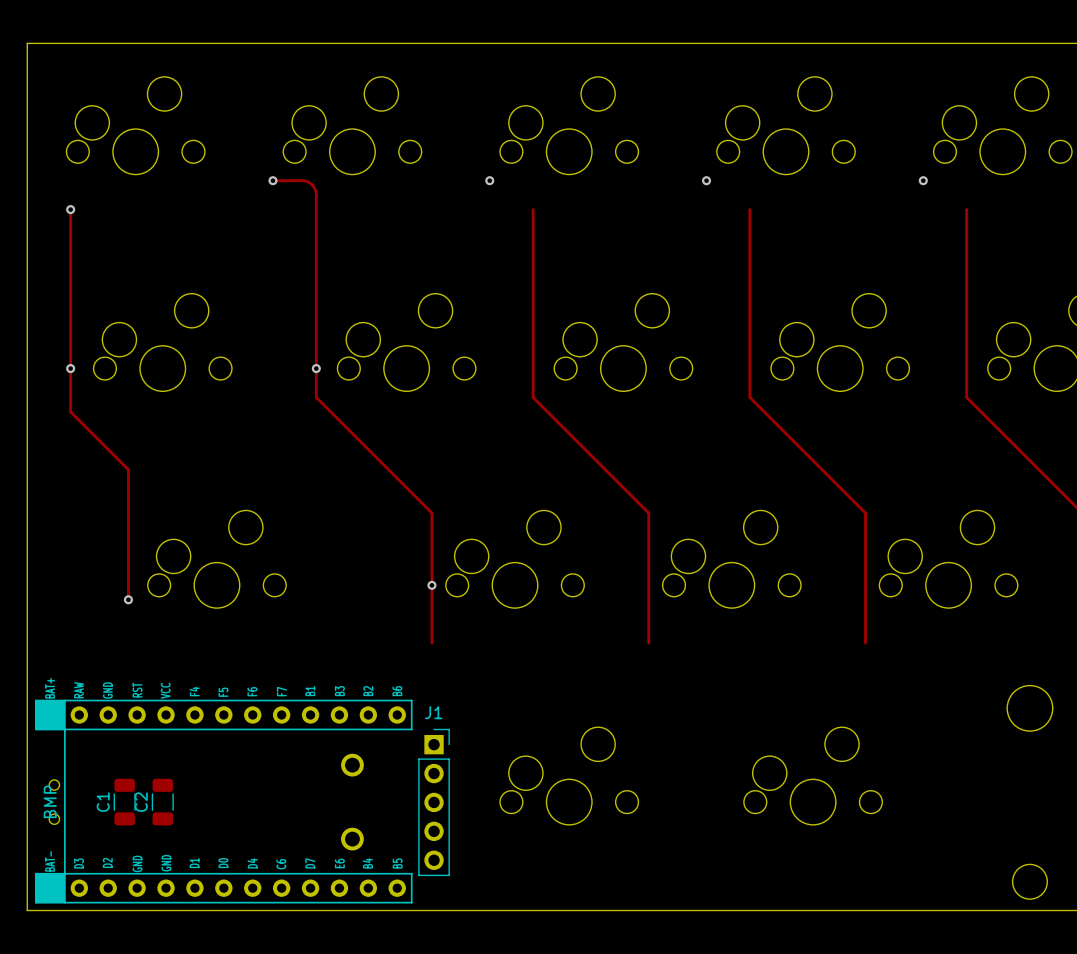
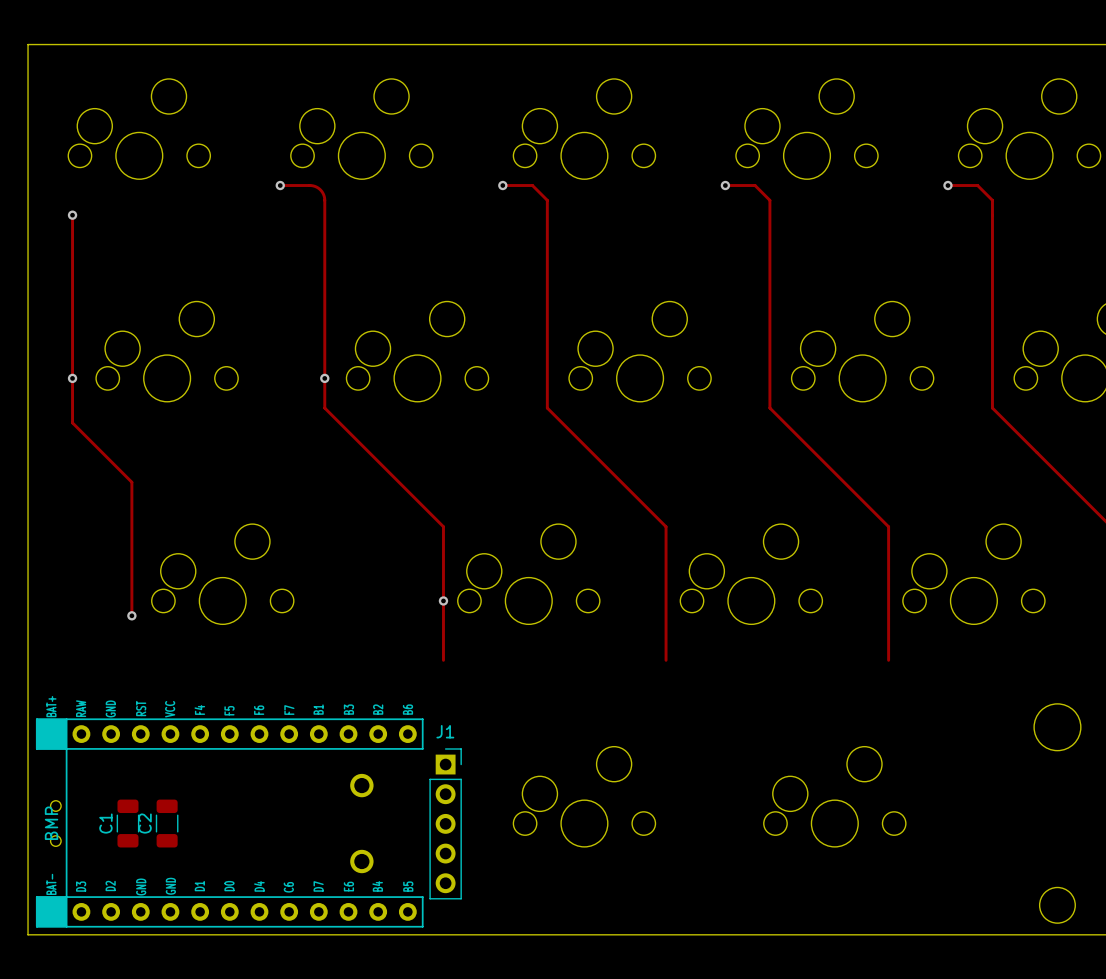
track: none -> (502, 185) (532, 185) (547, 200) (547, 215)
track: none -> (725, 185) (755, 185) (769, 200) (769, 215)
track: none -> (947, 185) (977, 185) (992, 200) (992, 215)

